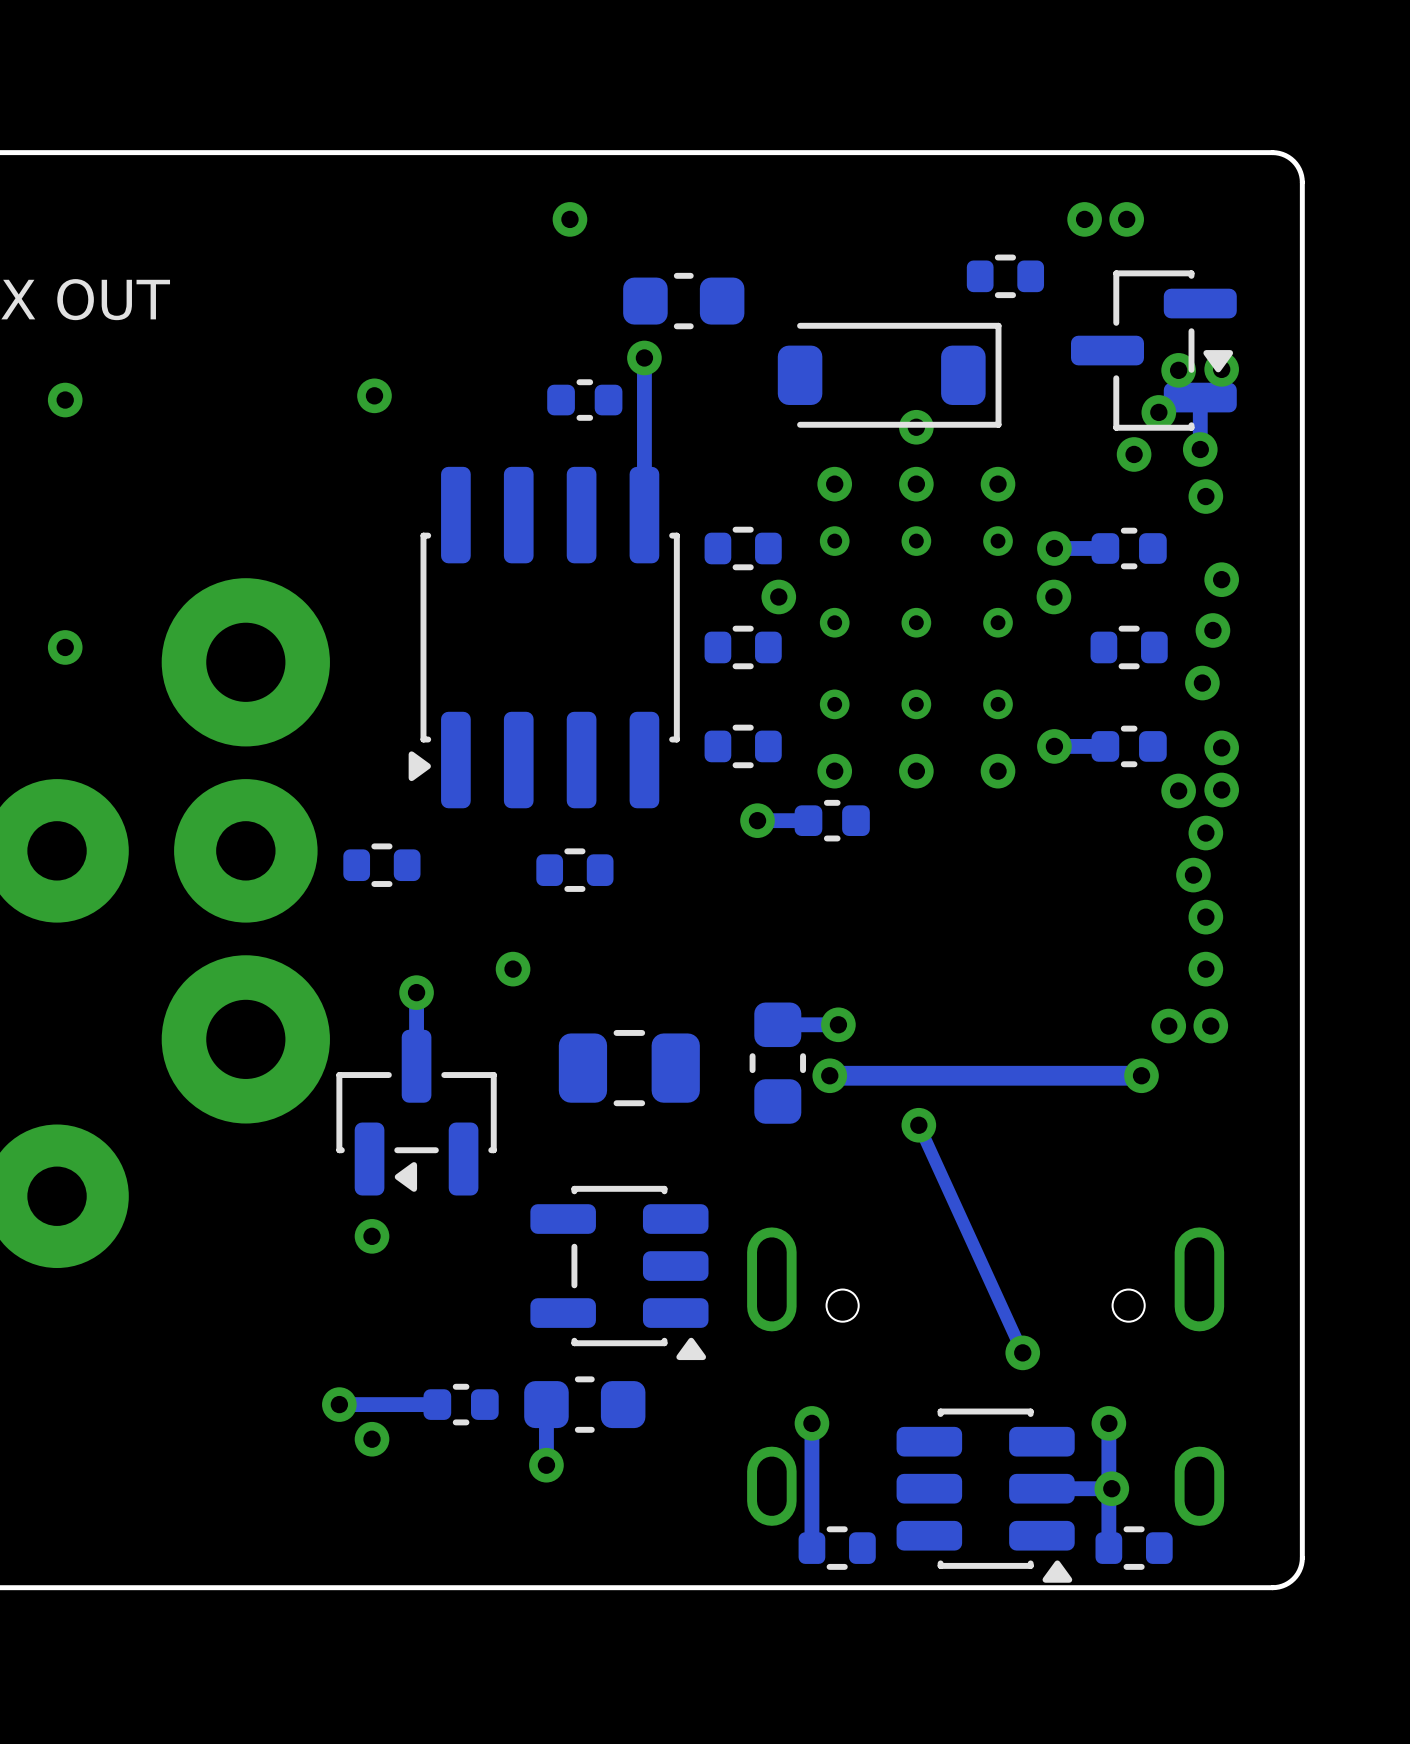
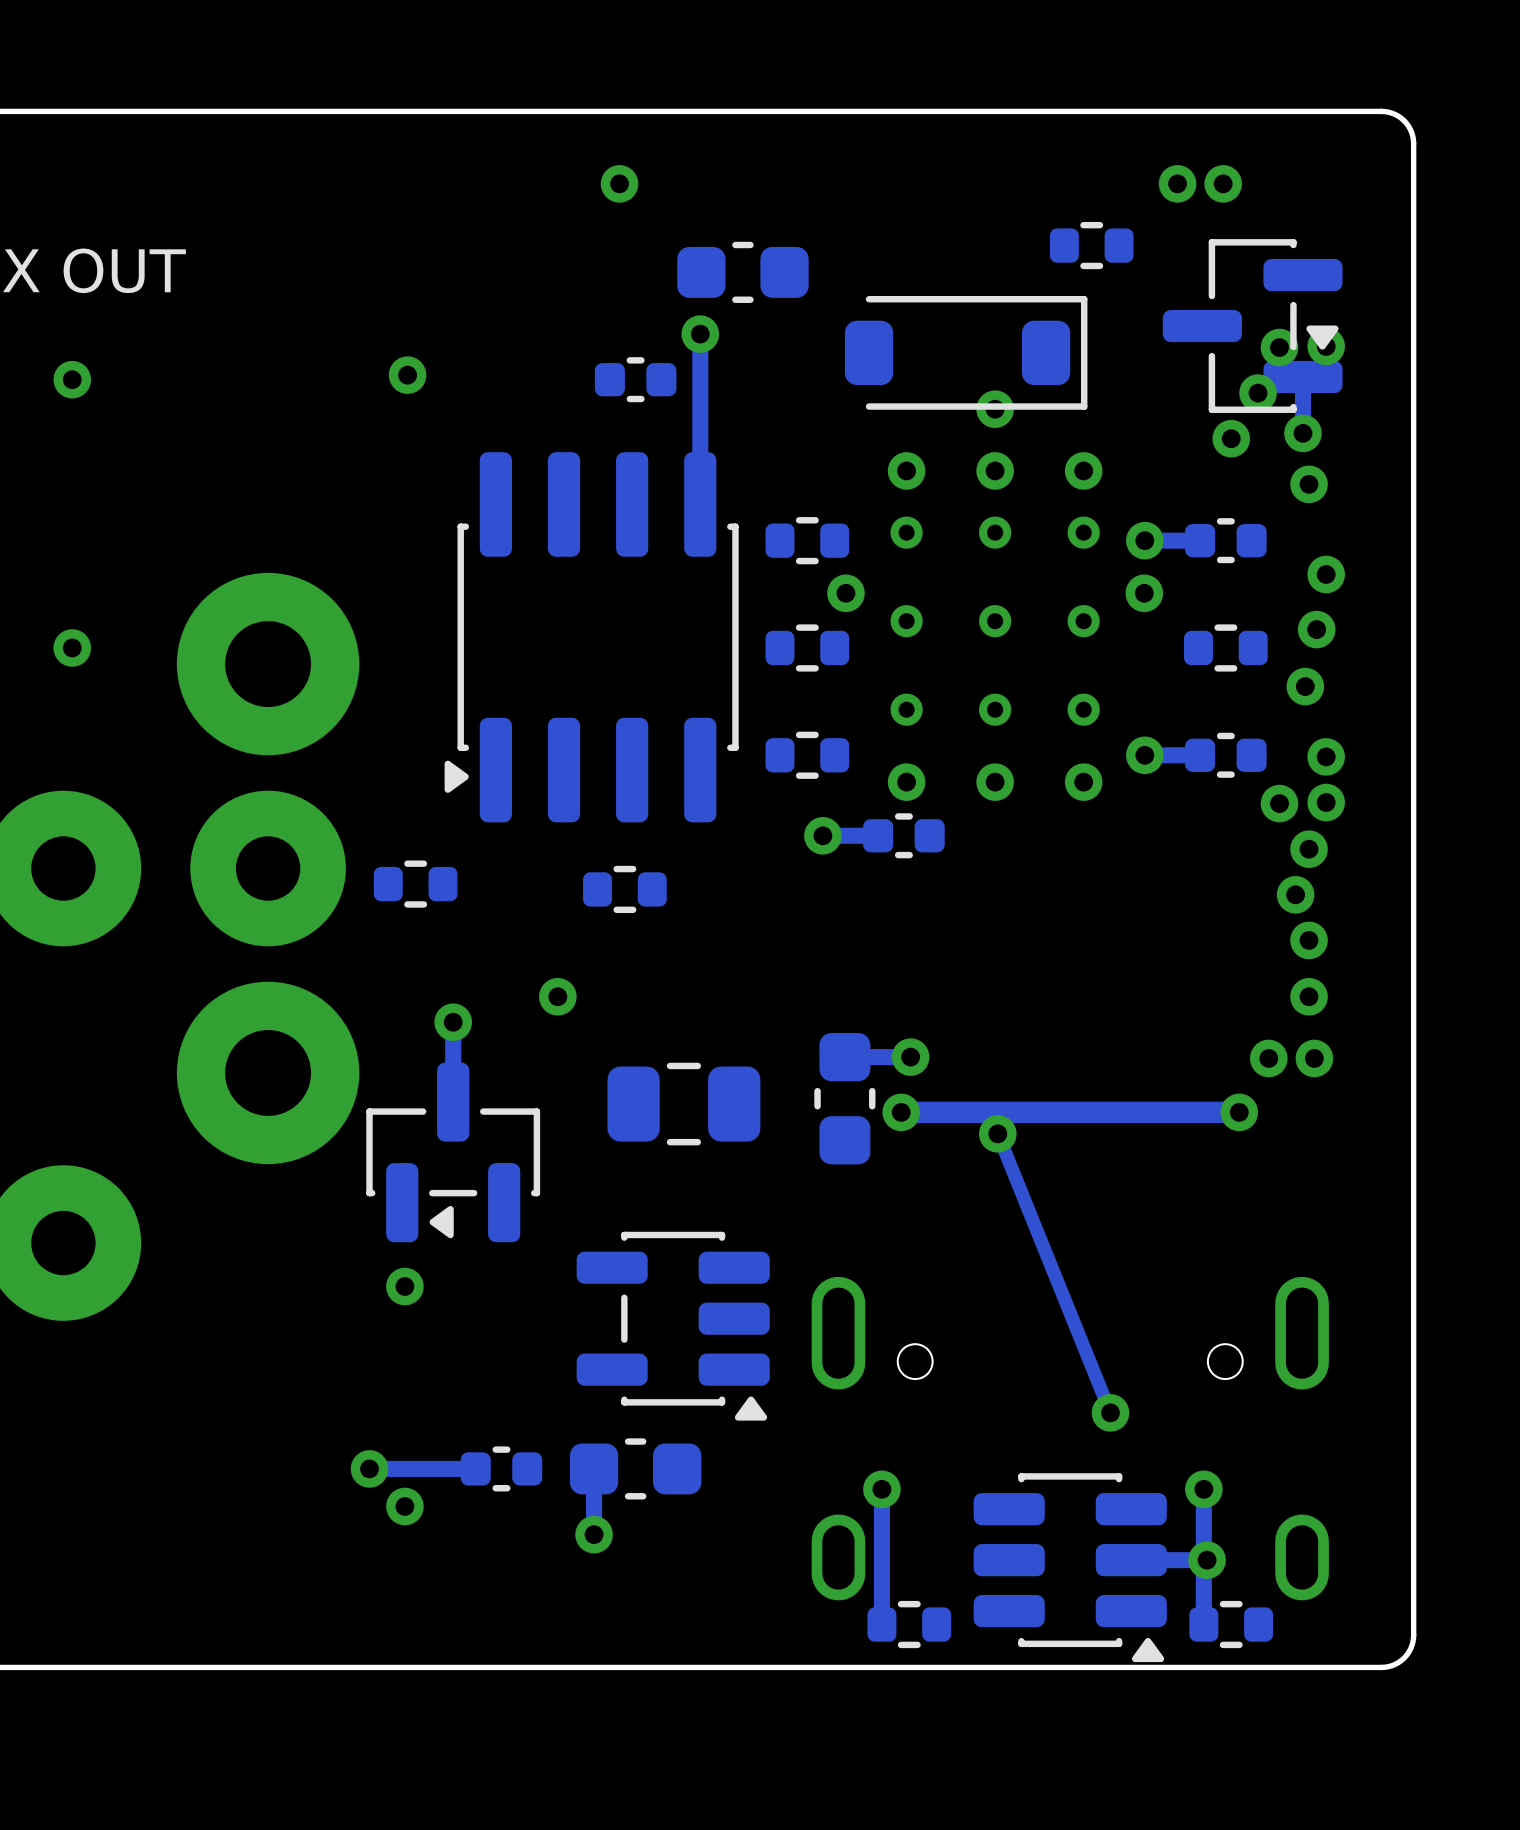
track: (918, 1125) (1022, 1352) -> (997, 1133) (1110, 1412)
via position: (918, 1125) -> (997, 1133)

